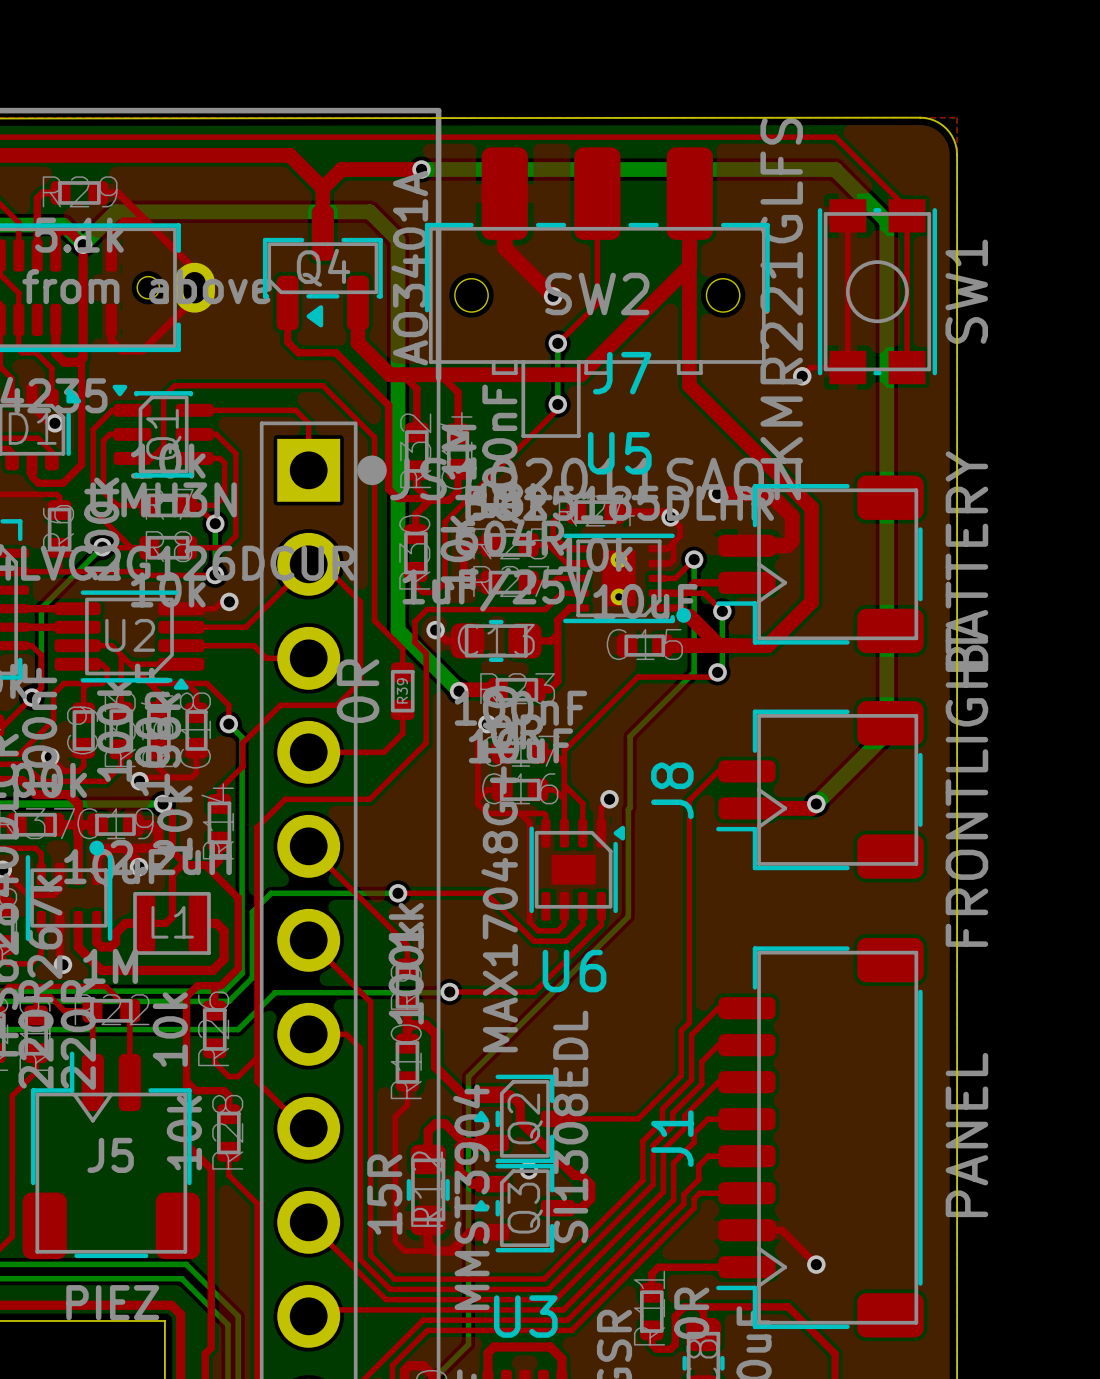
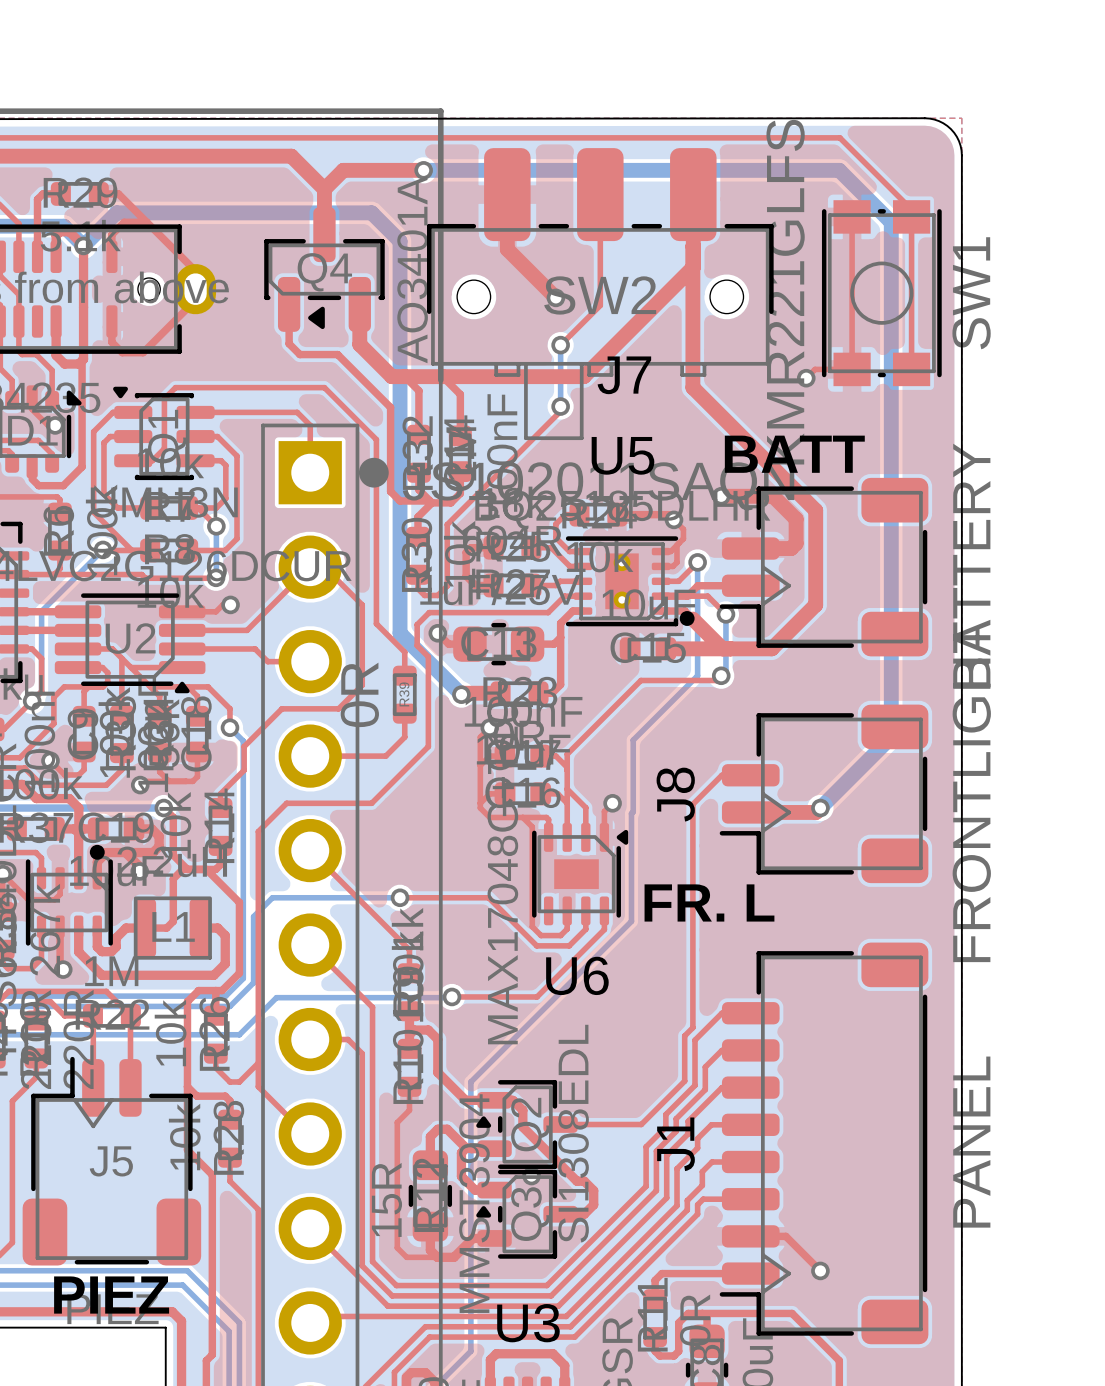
text: none -> BATT (794, 454)
text: none -> FR. L (709, 902)
text: none -> PIEZ (111, 1295)

